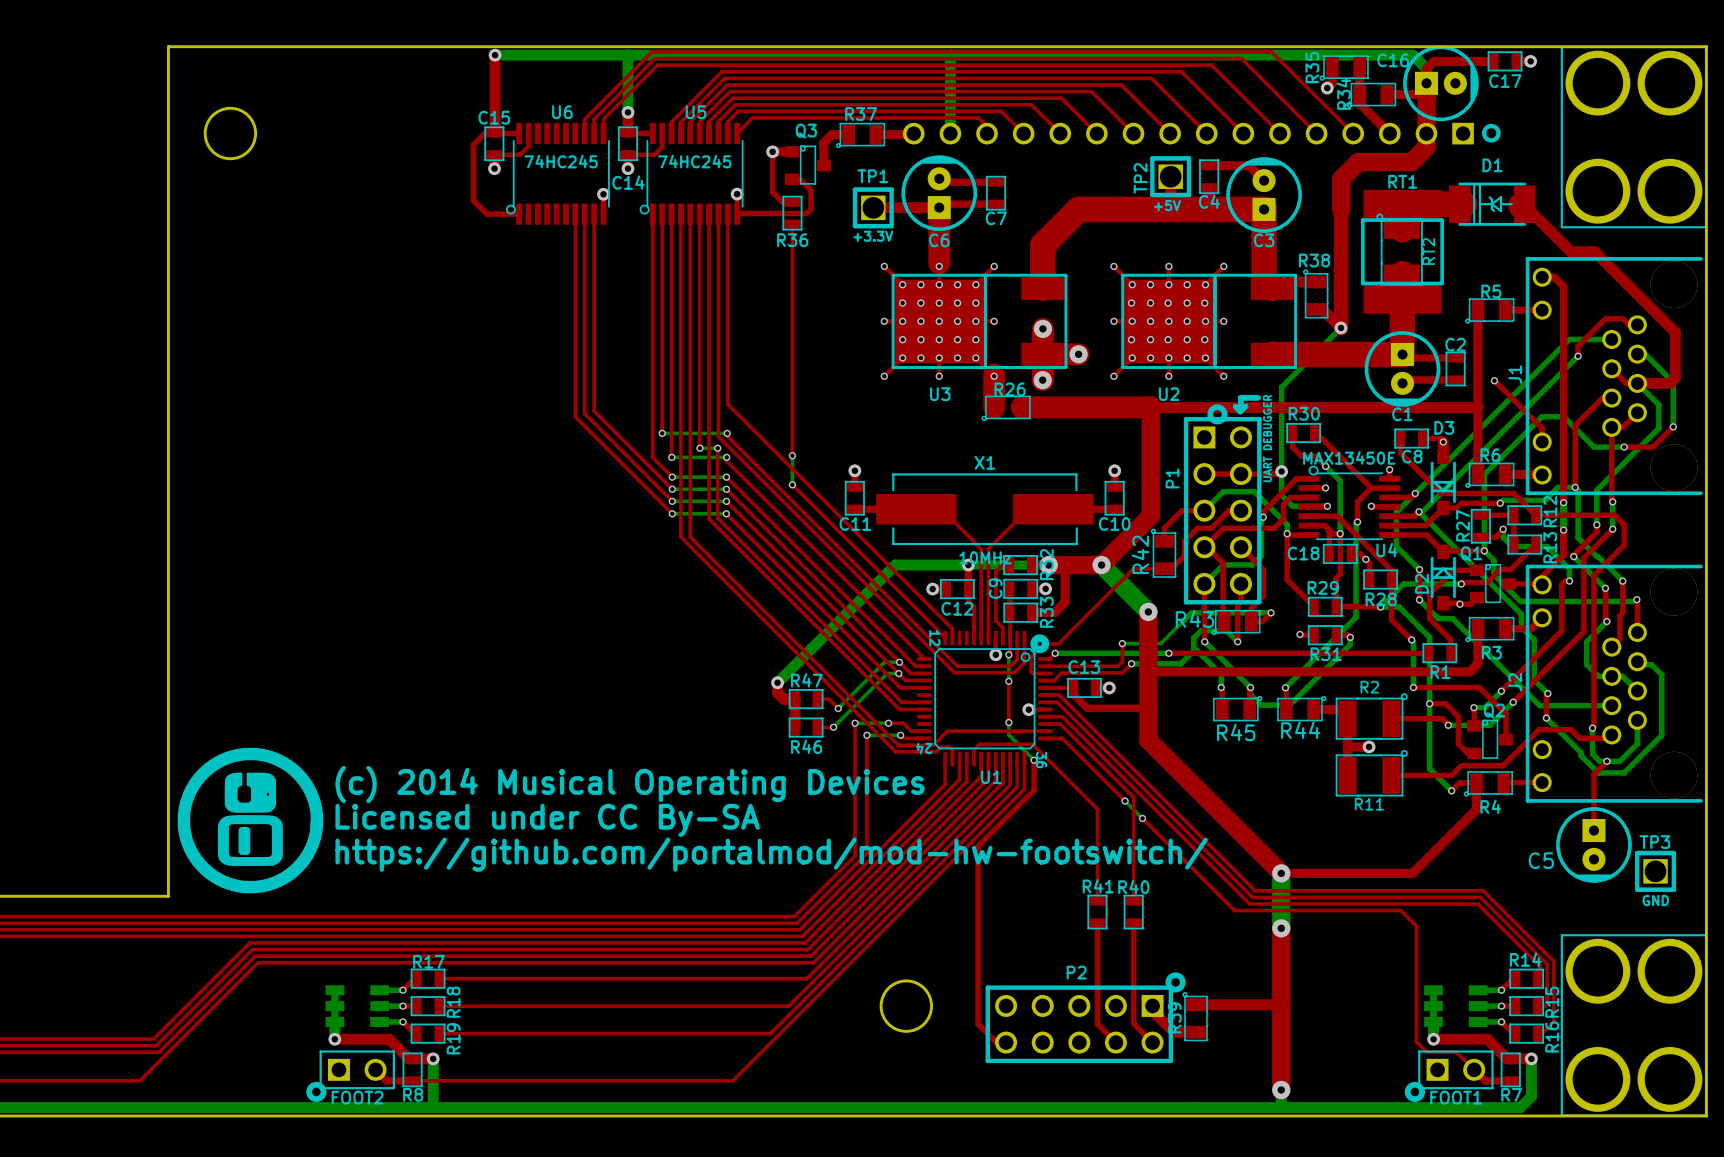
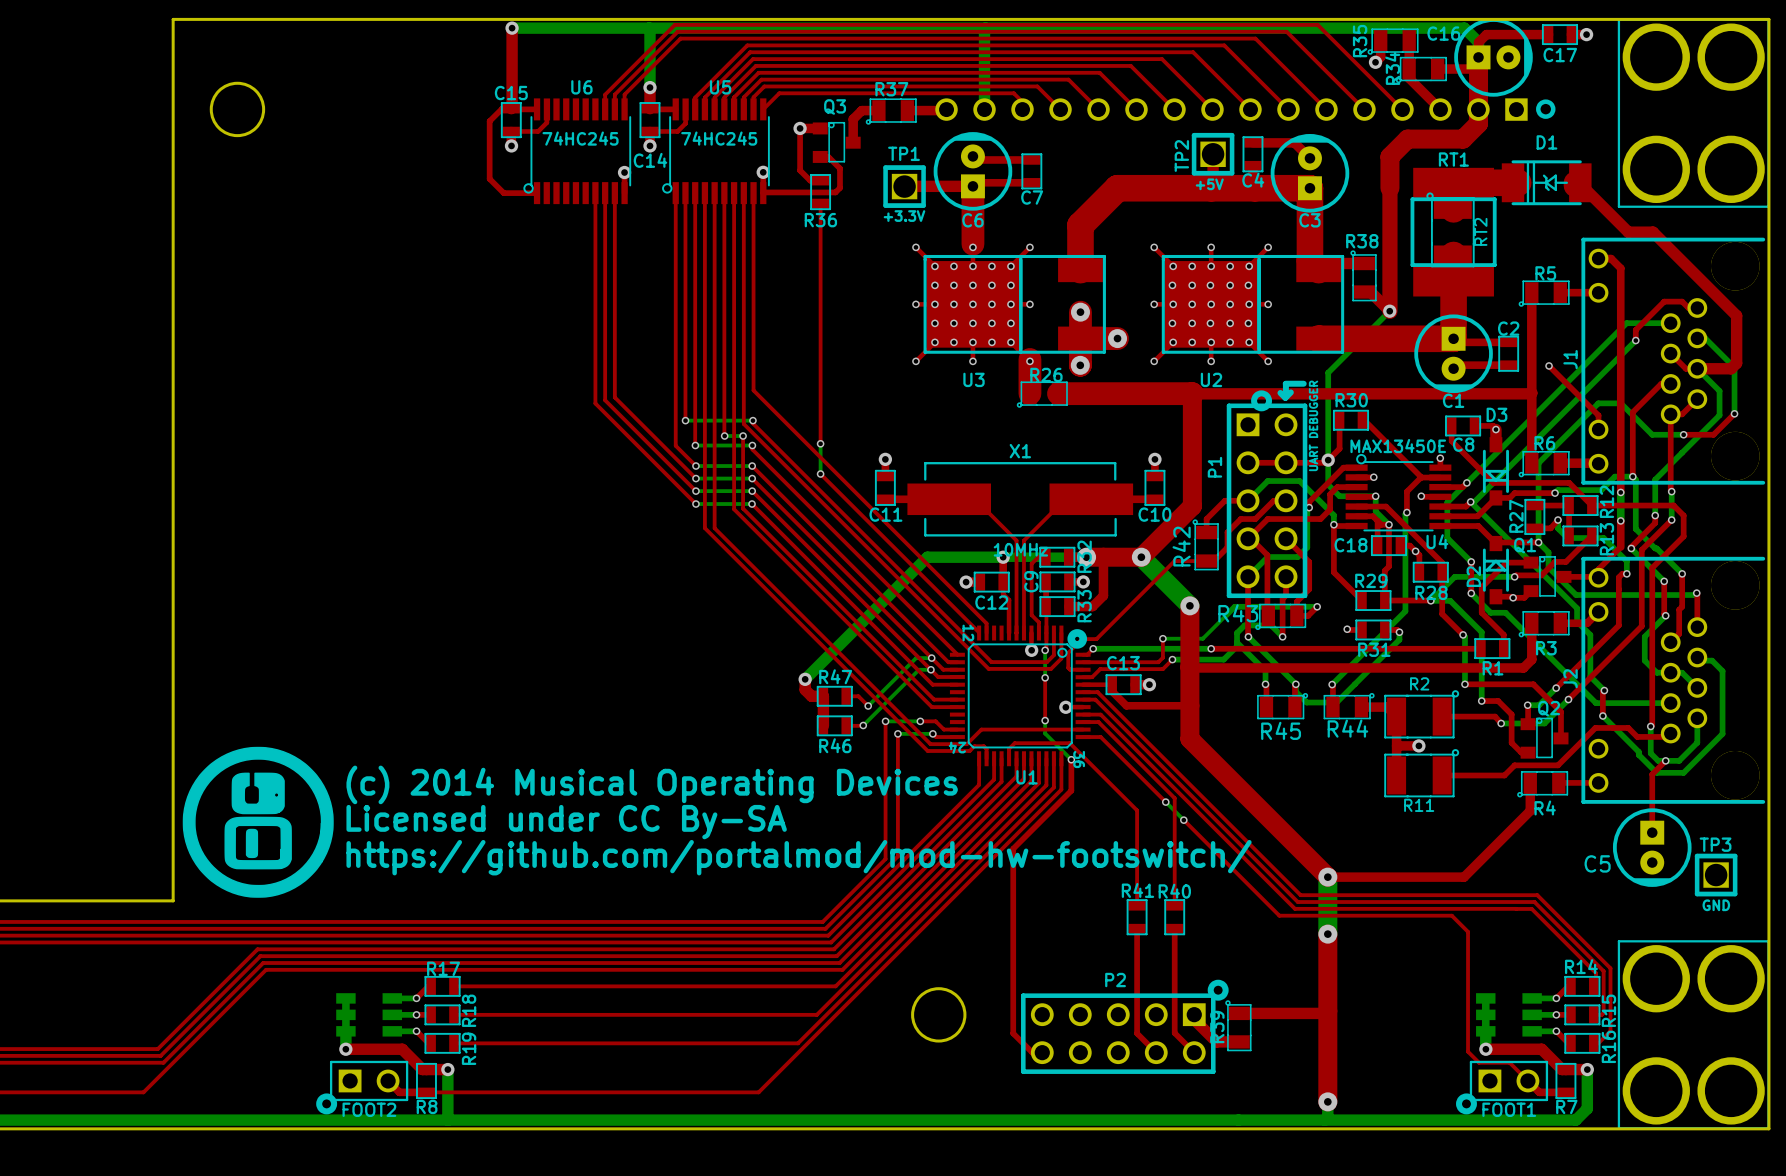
top track: (1292, 447) (1301, 456) (1315, 456) (1325, 466) -> (1339, 434) (1339, 448) (1328, 460)
bottom track: (1325, 466) (1340, 480) (1340, 533) -> (1375, 496) (1375, 511) (1388, 524)
via: (1325, 466) -> none
bottom track: (1429, 703) (1429, 768) (1451, 790) -> none
top track: (1476, 782) (1459, 782) (1451, 790) -> none
via: (1451, 790) -> none

